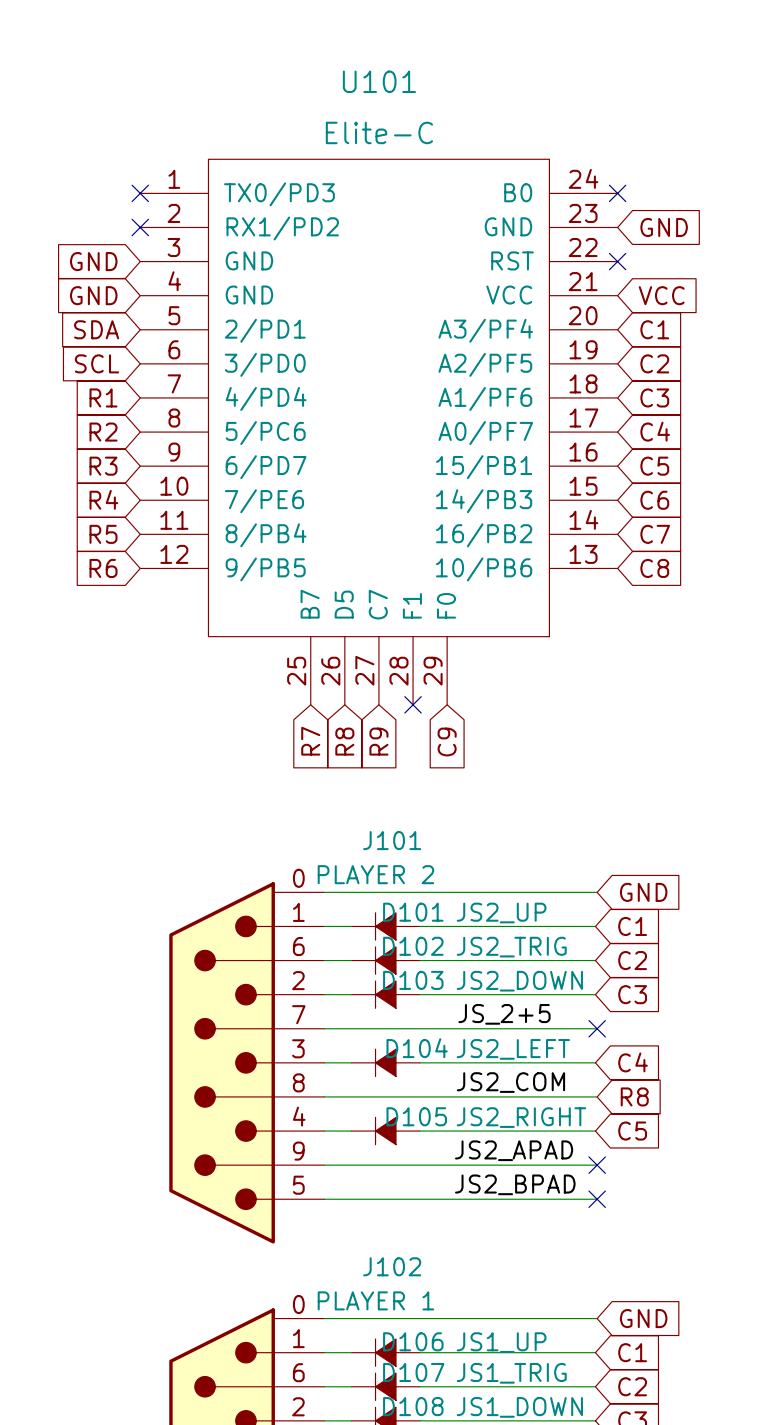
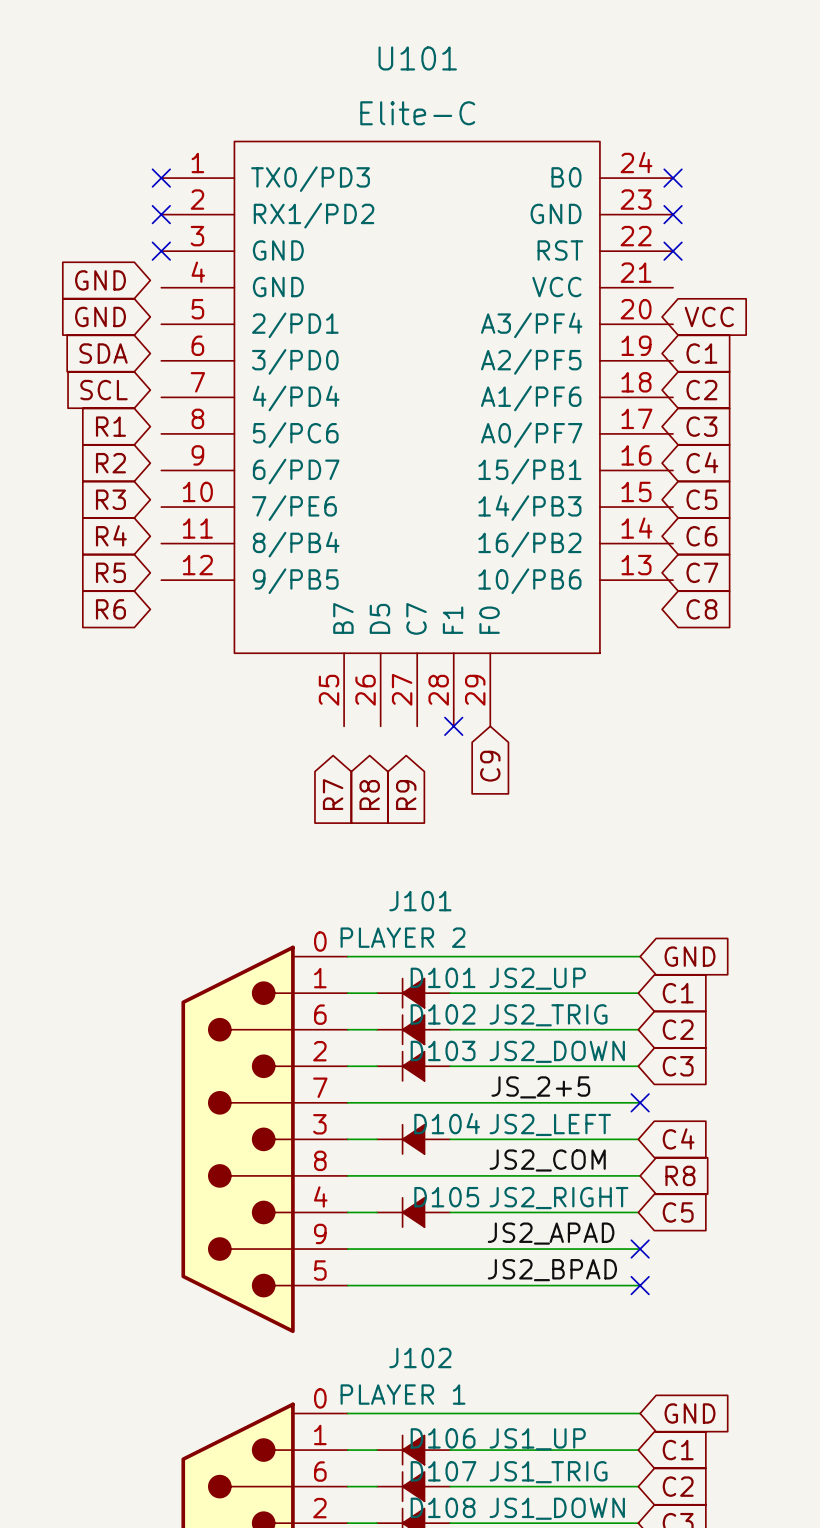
no-connect mark: none -> (161, 178)
no-connect mark: none -> (673, 178)
no-connect mark position: (140, 193) -> (161, 214)
no-connect mark position: (617, 193) -> (673, 214)
no-connect mark position: (140, 227) -> (161, 251)
global label: GND (664, 227) -> none
no-connect mark: none -> (673, 251)
no-connect mark: (617, 261) -> none
U101 position: (378, 432) -> (417, 433)
no-connect mark position: (413, 704) -> (453, 726)
global label position: C9 (447, 742) -> C9 (490, 766)

